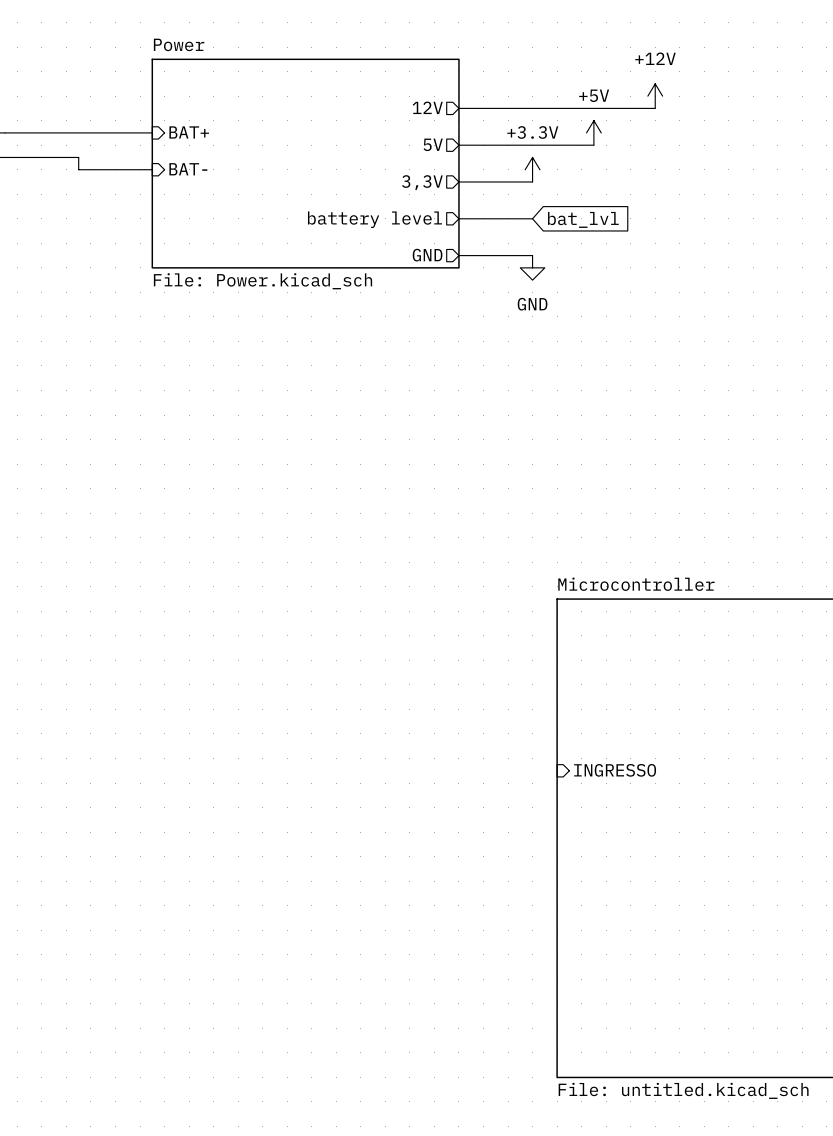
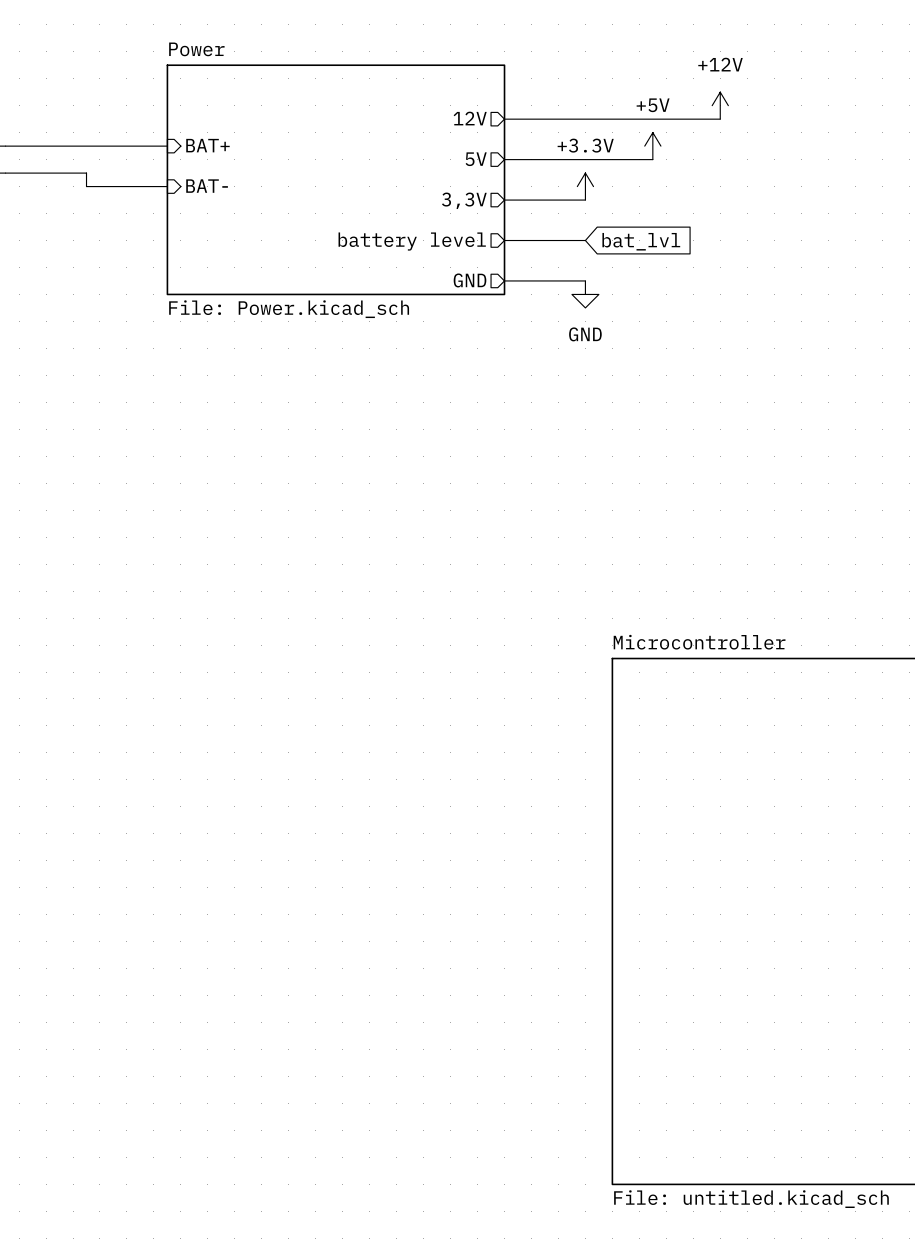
sheet pin: INGRESSO (615, 770) -> none

